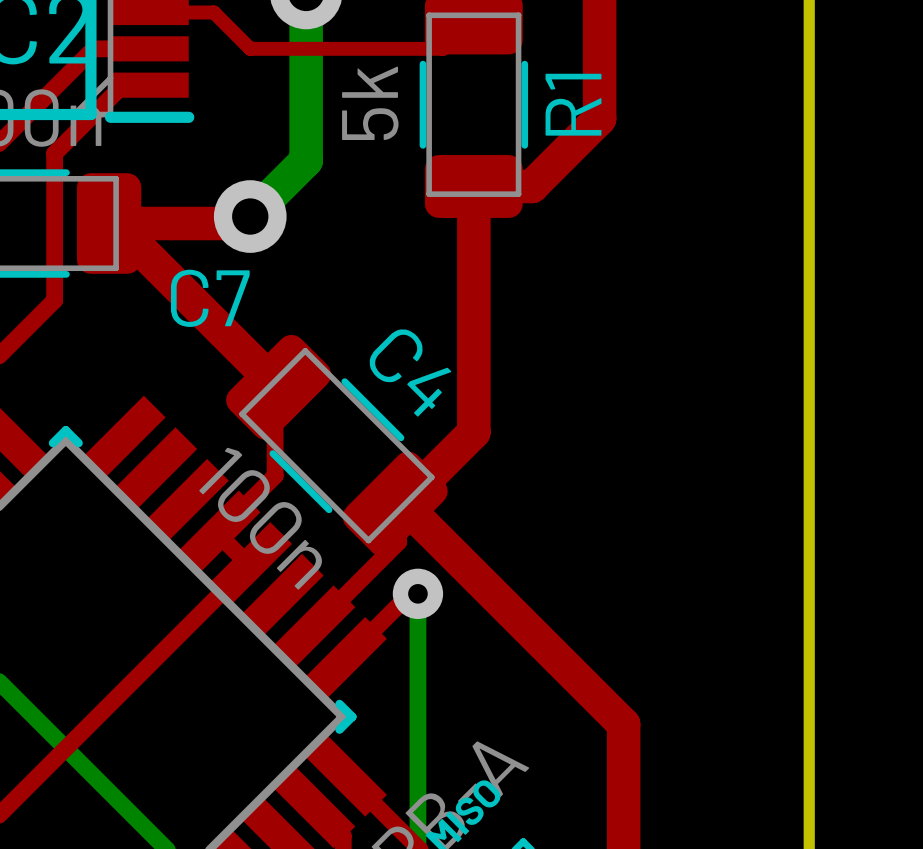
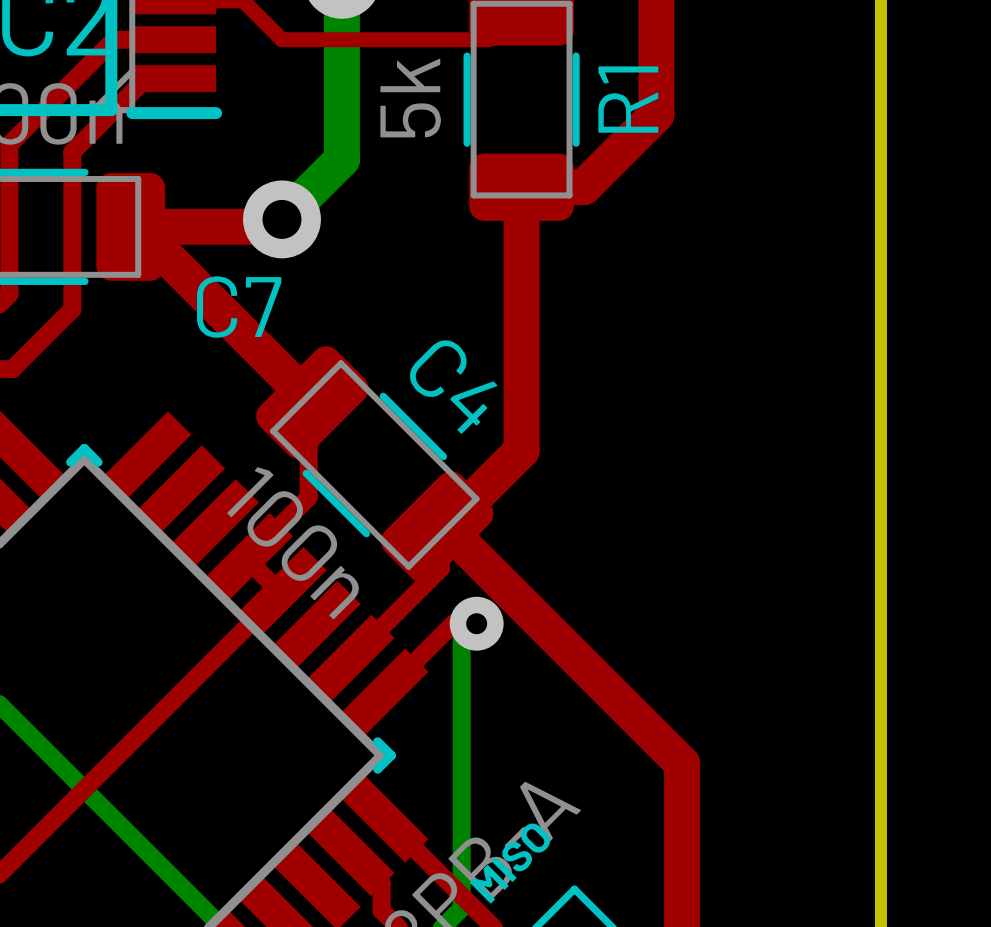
via position: (417, 593) -> (476, 623)

